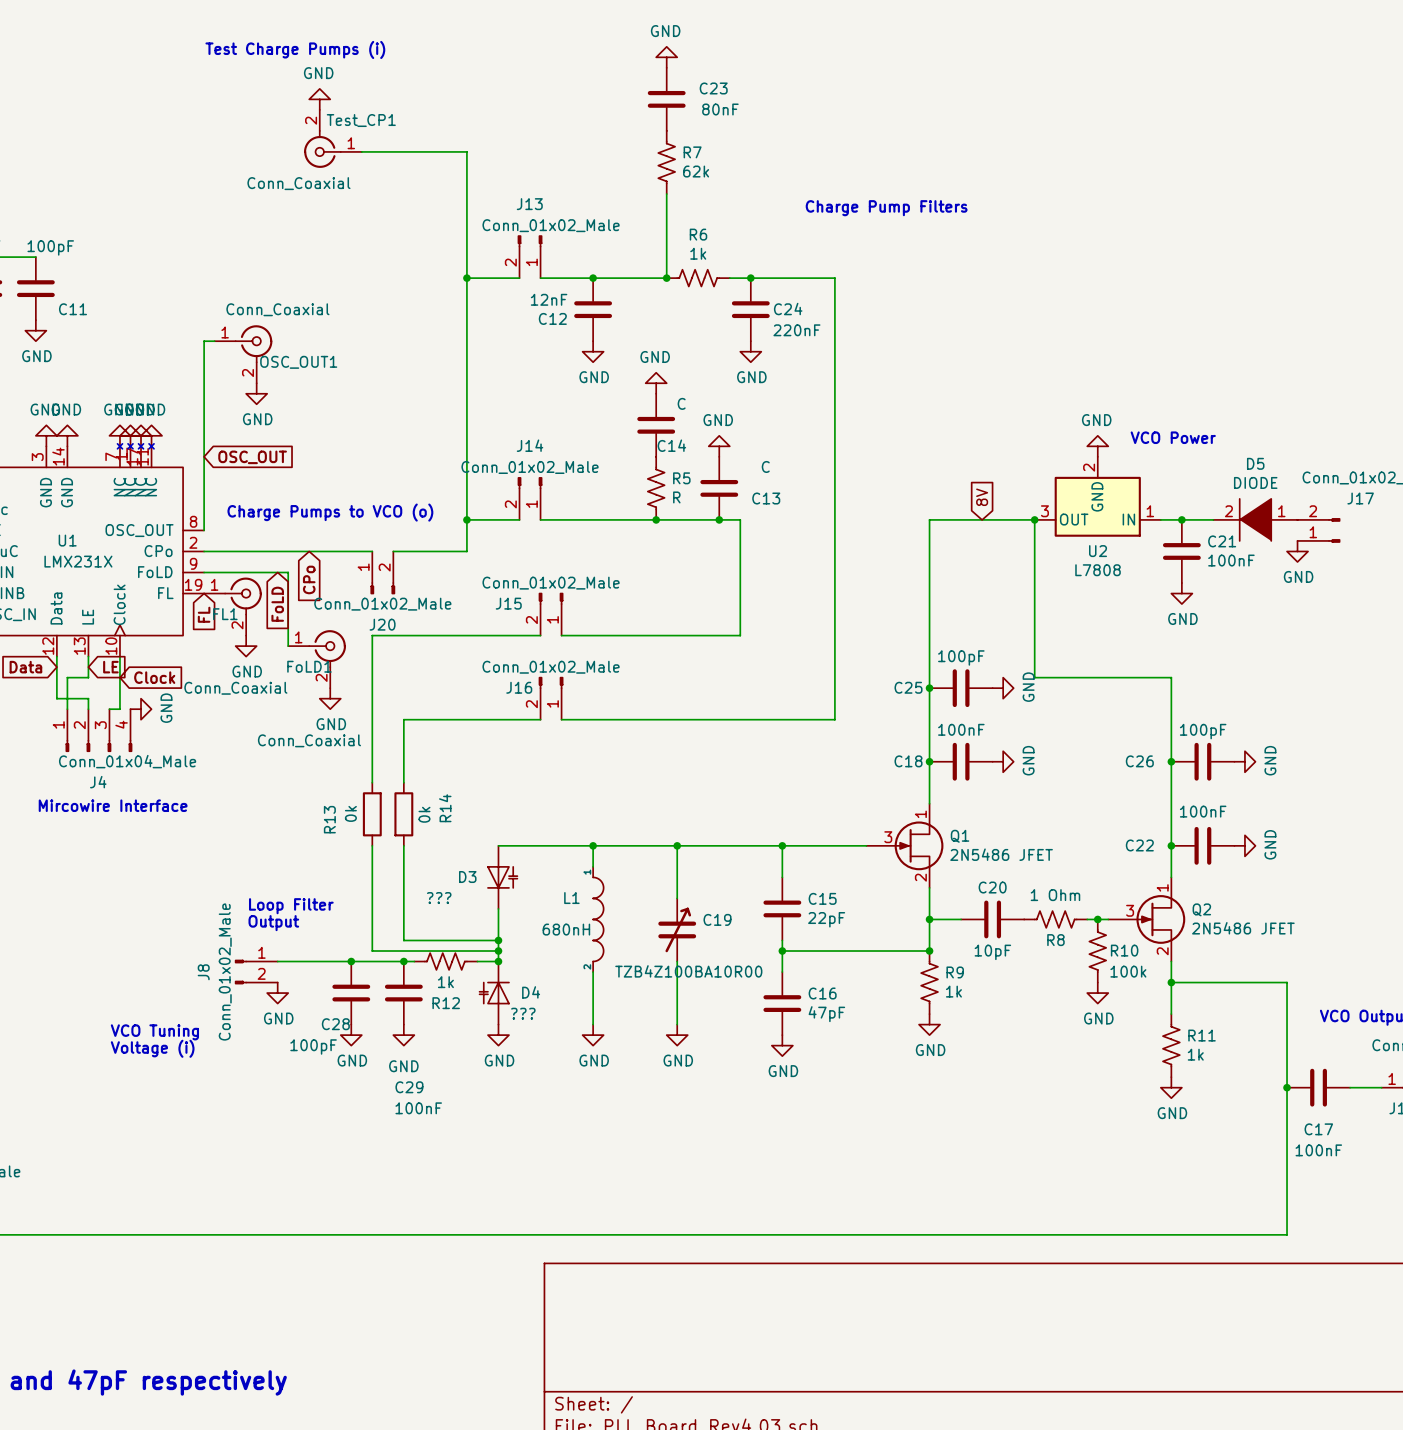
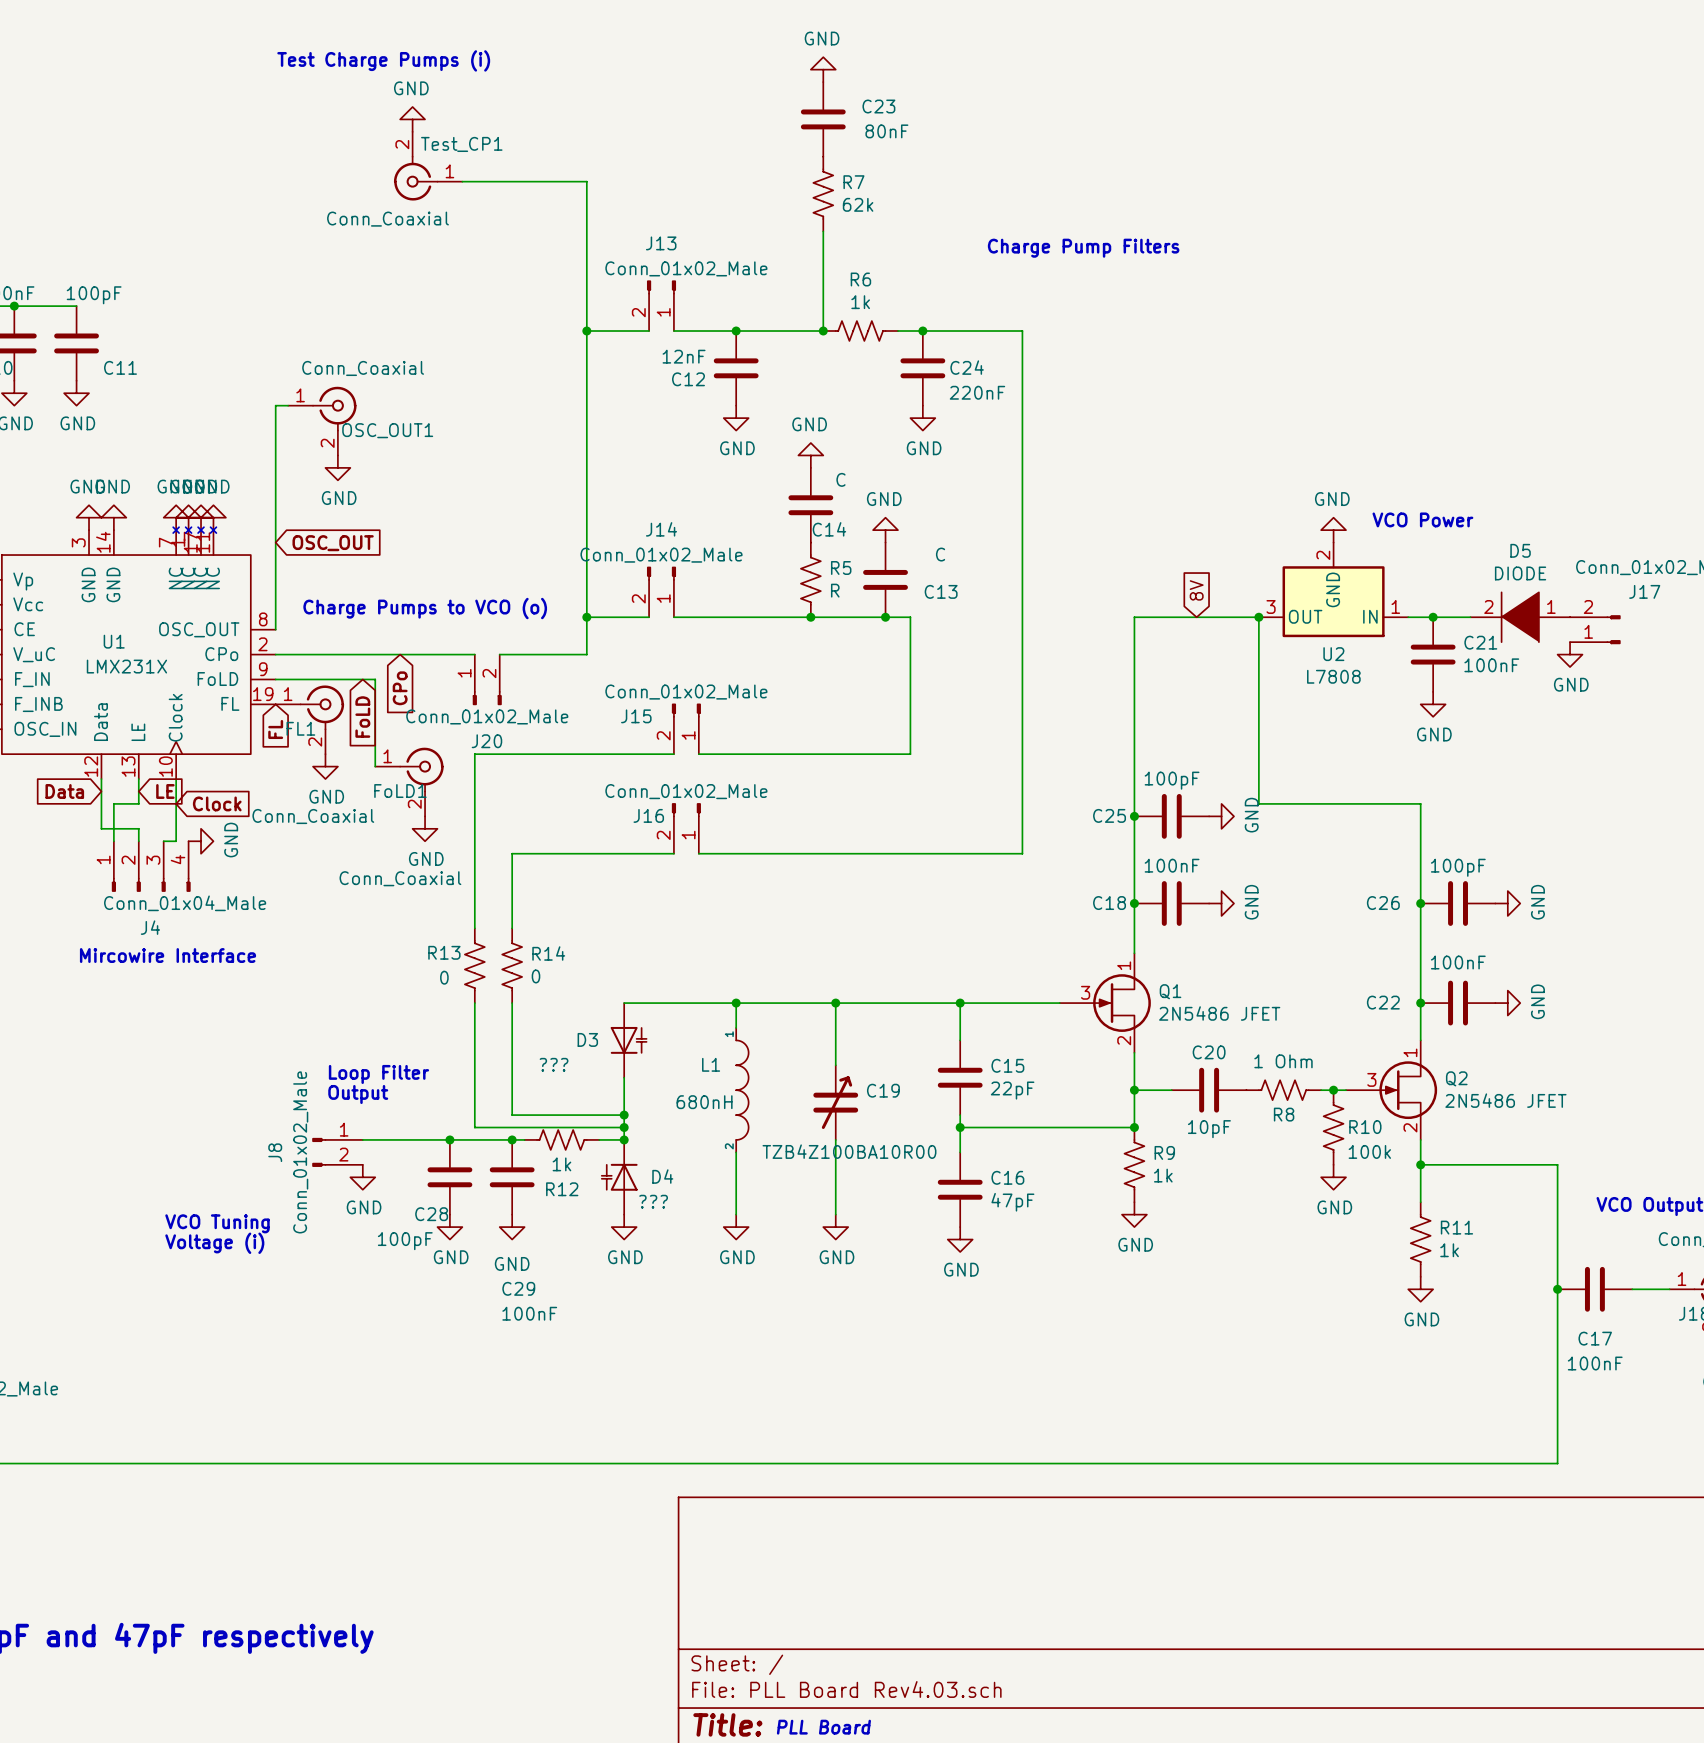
R13 symbol: [362, 782, 382, 846] -> [464, 928, 485, 1004]
R14 symbol: [394, 782, 414, 846] -> [502, 928, 523, 1004]
R13 value: 0k (350, 813) -> 0 (444, 977)
R14 value: 0k (424, 814) -> 0 (535, 976)
R13 name position: R13 (329, 819) -> R13 (444, 952)

